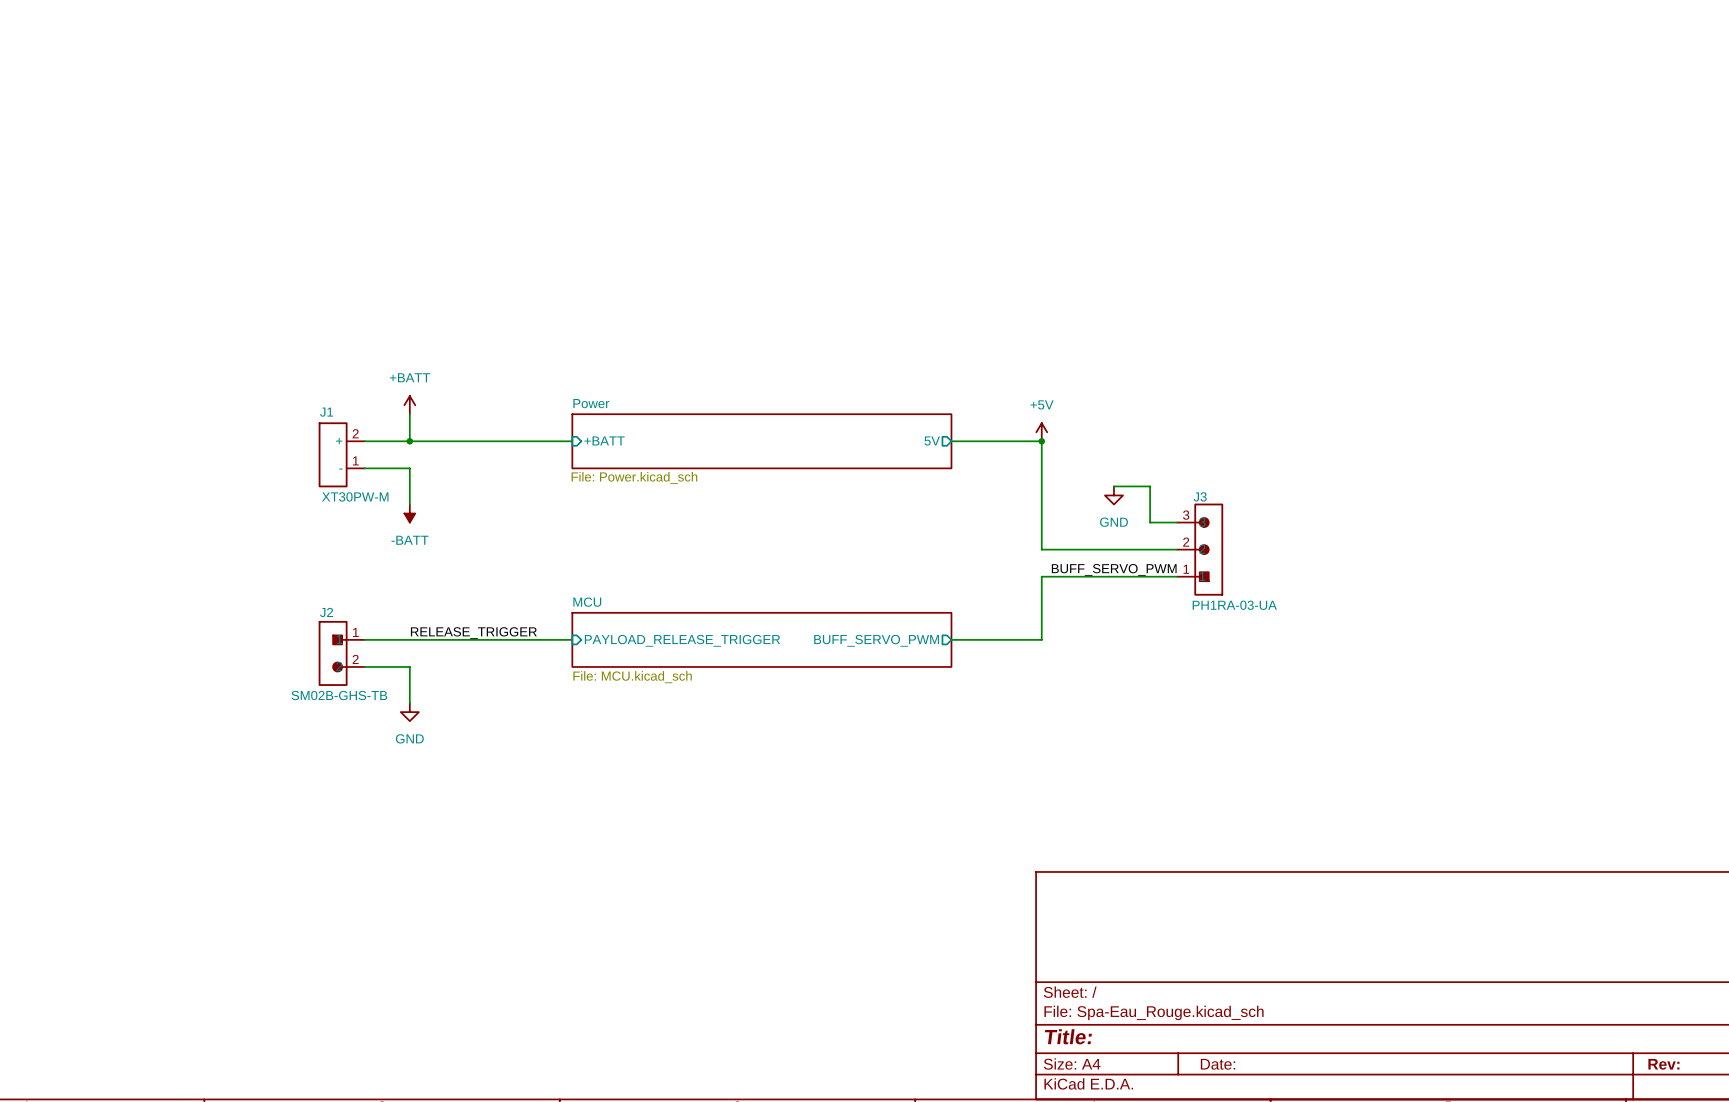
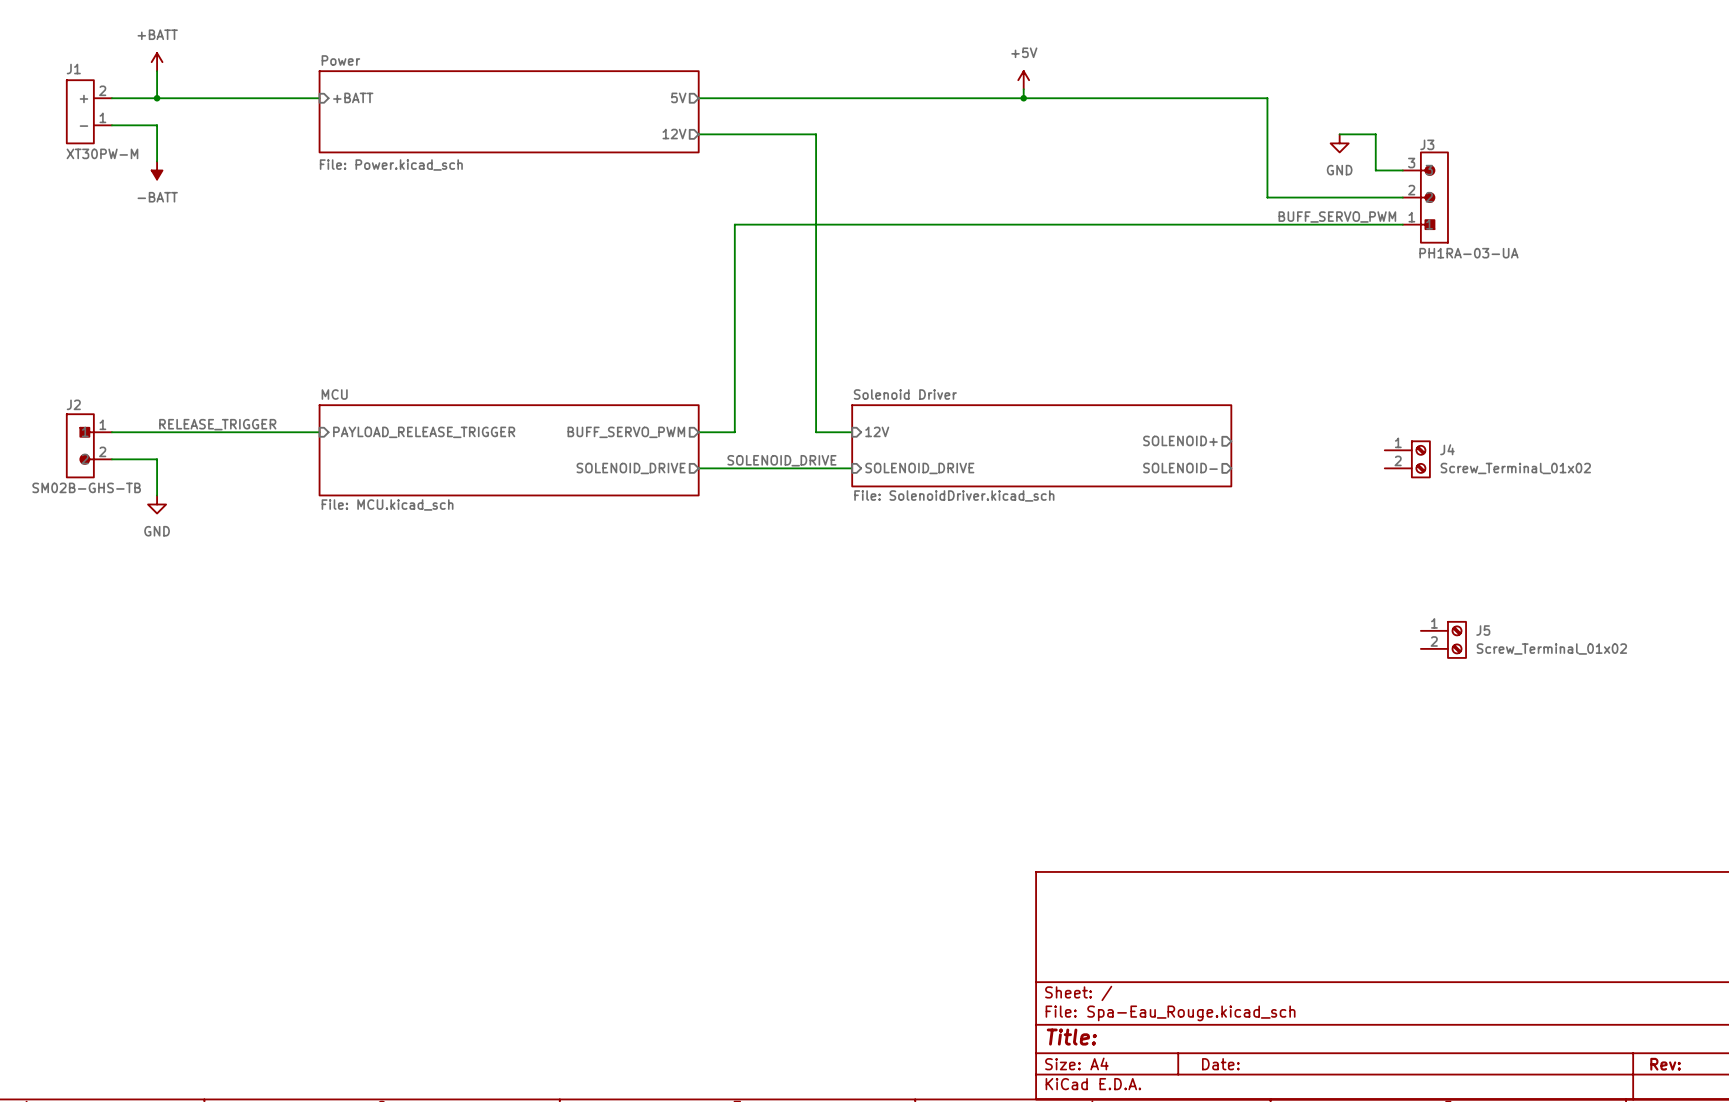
power symbol: none -> +BATT (157, 62)
wire: none -> (157, 71) (157, 98)
power symbol: none -> +5V (1023, 80)
wire: none -> (1023, 89) (1023, 98)
sheet pin: none -> +BATT (353, 97)
sheet pin: none -> 5V (678, 97)
wire: none -> (111, 98) (319, 98)
junction: none -> (157, 98)
wire: none -> (698, 98) (1267, 98) (1267, 197) (1402, 197)
junction: none -> (1023, 98)
sheet Power: none -> File: Power.kicad_sch (509, 111)
wire: none -> (111, 125) (157, 125) (157, 161)
sheet pin: none -> 12V (674, 134)
wire: none -> (698, 134) (816, 134) (816, 432) (852, 432)
wire: none -> (1339, 134) (1375, 134) (1375, 170) (1402, 170)
power symbol: none -> GND (1339, 143)
power symbol: none -> -BATT (157, 170)
label: none -> BUFF_SERVO_PWM (1337, 217)
wire: none -> (1402, 224) (734, 224) (734, 432) (698, 432)
power symbol: +BATT (409, 405) -> none
wire: (409, 414) (409, 441) -> none
label: none -> RELEASE_TRIGGER (217, 424)
sheet pin: none -> 12V (877, 431)
wire: none -> (111, 432) (319, 432)
power symbol: +5V (1041, 432) -> none
sheet pin: none -> PAYLOAD_RELEASE_TRIGGER (424, 432)
sheet pin: none -> BUFF_SERVO_PWM (626, 432)
sheet pin: +BATT (604, 440) -> none
sheet pin: none -> SOLENOID+ (1180, 440)
wire: (364, 441) (572, 441) -> none
junction: (409, 441) -> none
sheet Power: File: Power.kicad_sch (761, 441) -> none
sheet pin: 5V (932, 441) -> none
wire: (951, 441) (1041, 441) (1041, 549) (1177, 549) -> none
junction: (1041, 441) -> none
sheet Solenoid Driver: none -> File: SolenoidDriver.kicad_sch (1041, 445)
sheet MCU: none -> File: MCU.kicad_sch (509, 450)
J1 position: (341, 454) -> (88, 111)
wire: none -> (111, 459) (157, 459) (157, 495)
J4: none -> Screw_Terminal_01x02 (1407, 459)
label: none -> SOLENOID_DRIVE (781, 460)
wire: (364, 468) (409, 468) (409, 504) -> none
sheet pin: none -> SOLENOID- (1180, 468)
sheet pin: none -> SOLENOID_DRIVE (631, 468)
sheet pin: none -> SOLENOID_DRIVE (919, 468)
wire: (1113, 486) (1150, 486) (1150, 522) (1177, 522) -> none
power symbol: GND (1113, 495) -> none
power symbol: none -> GND (157, 504)
power symbol: -BATT (409, 513) -> none
J3 position: (1200, 549) -> (1425, 197)
label: BUFF_SERVO_PWM (1114, 569) -> none
wire: (1177, 576) (1041, 576) (1041, 639) (951, 639) -> none
label: RELEASE_TRIGGER (473, 633) -> none
wire: (364, 639) (572, 639) -> none
sheet MCU: File: MCU.kicad_sch (761, 639) -> none
J5: none -> Screw_Terminal_01x02 (1443, 639)
sheet pin: PAYLOAD_RELEASE_TRIGGER (682, 640) -> none
sheet pin: BUFF_SERVO_PWM (876, 640) -> none
J2 position: (341, 653) -> (88, 445)
wire: (364, 666) (409, 666) (409, 703) -> none
power symbol: GND (409, 712) -> none

